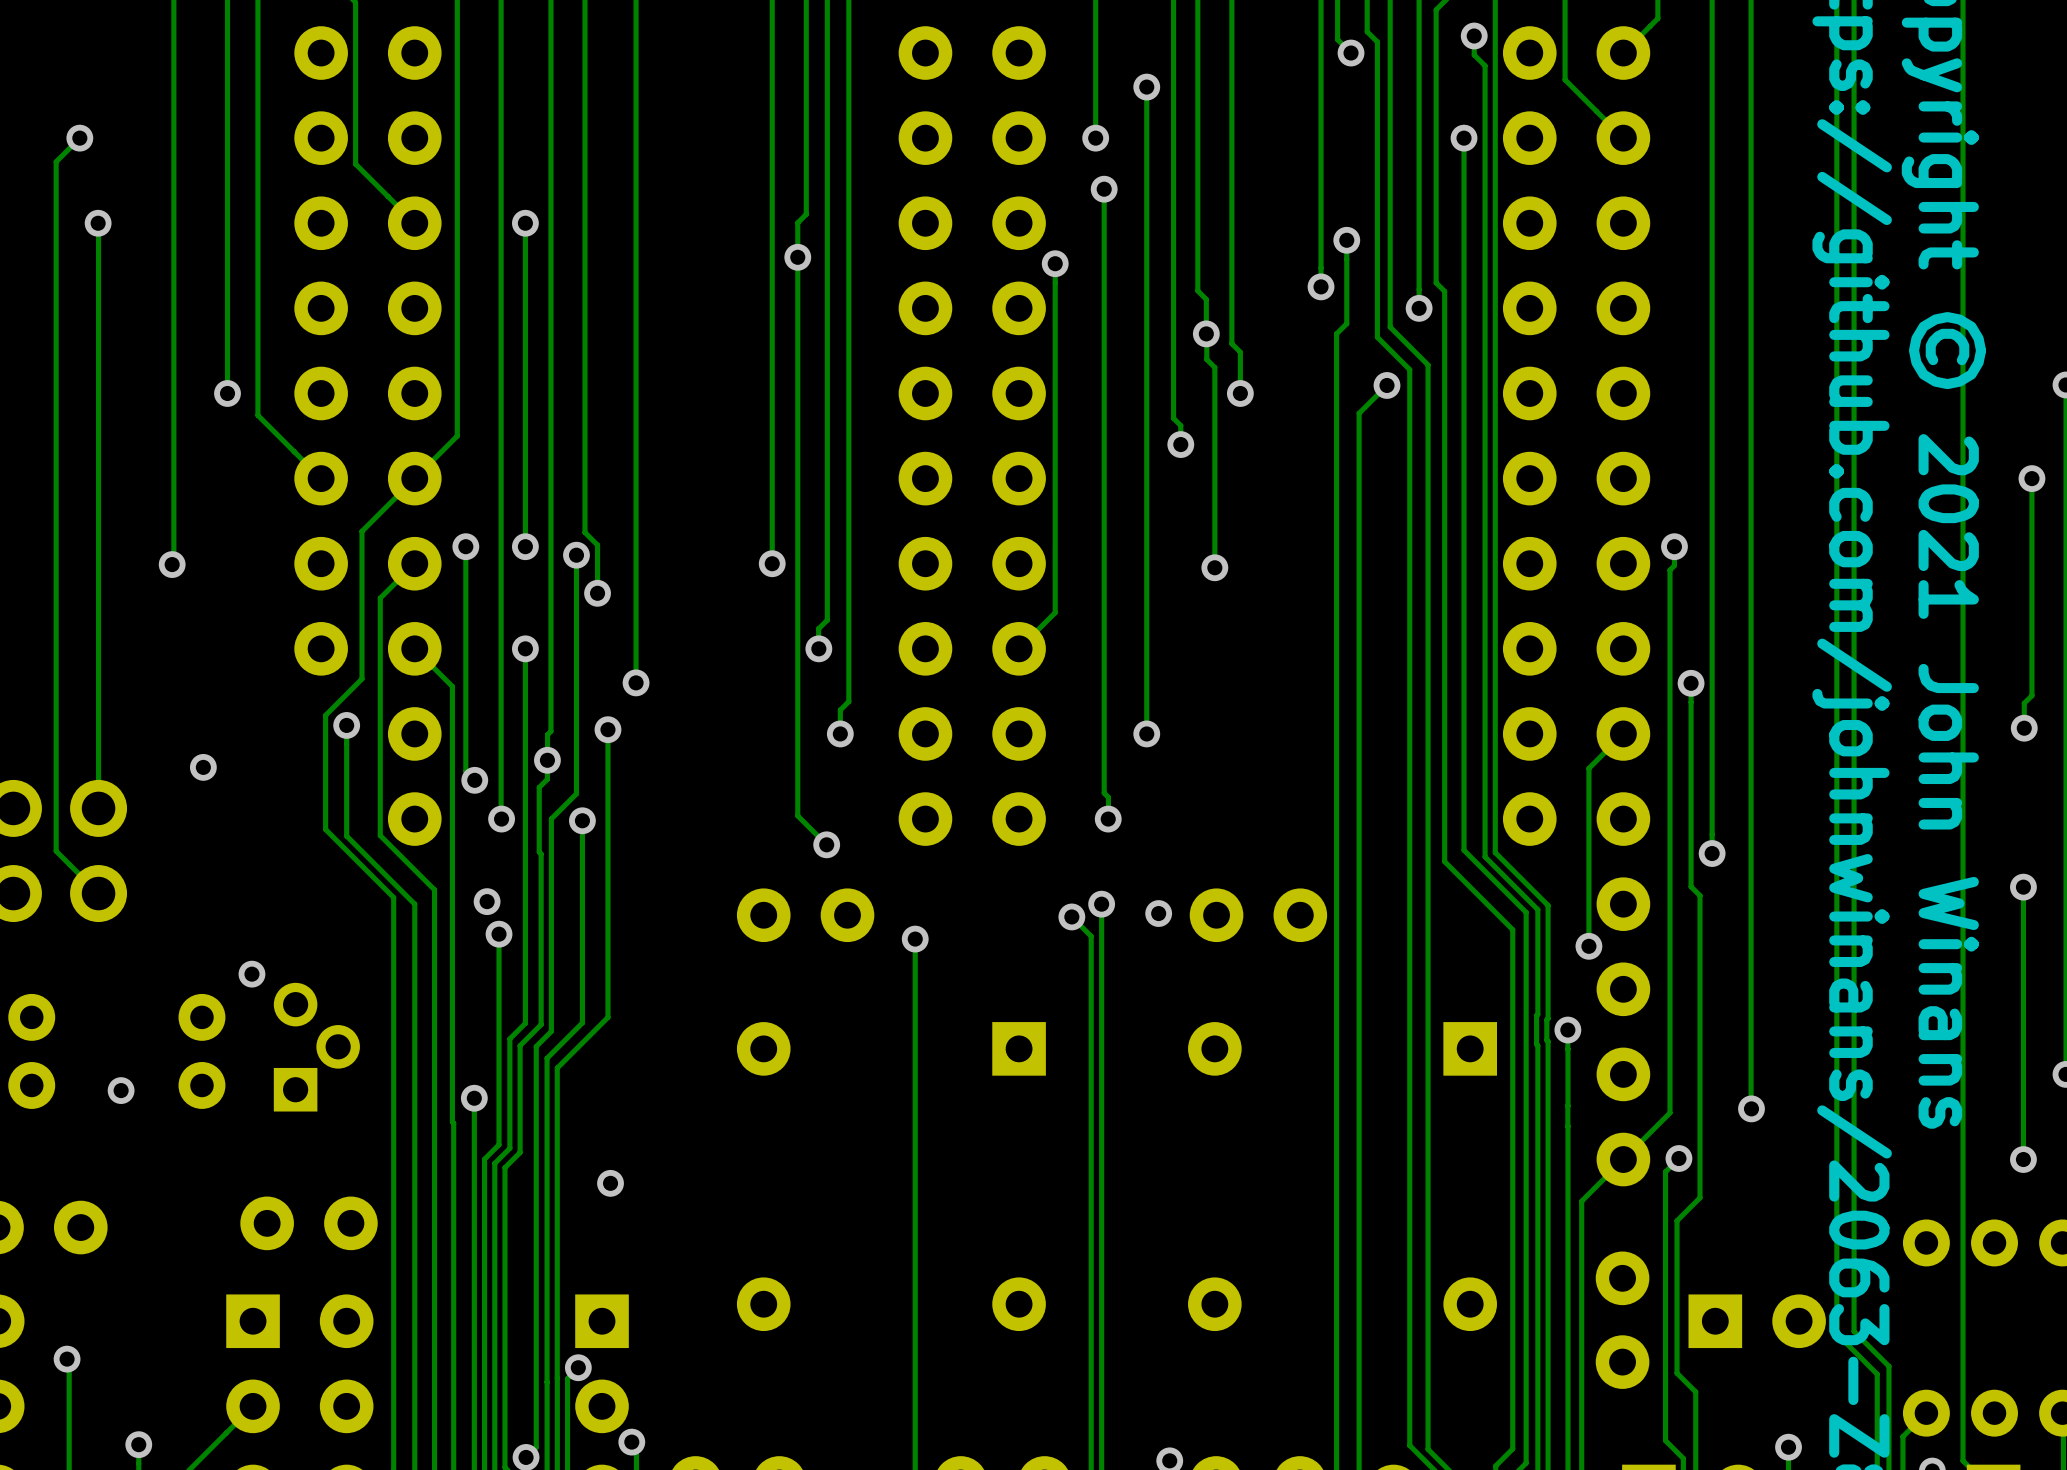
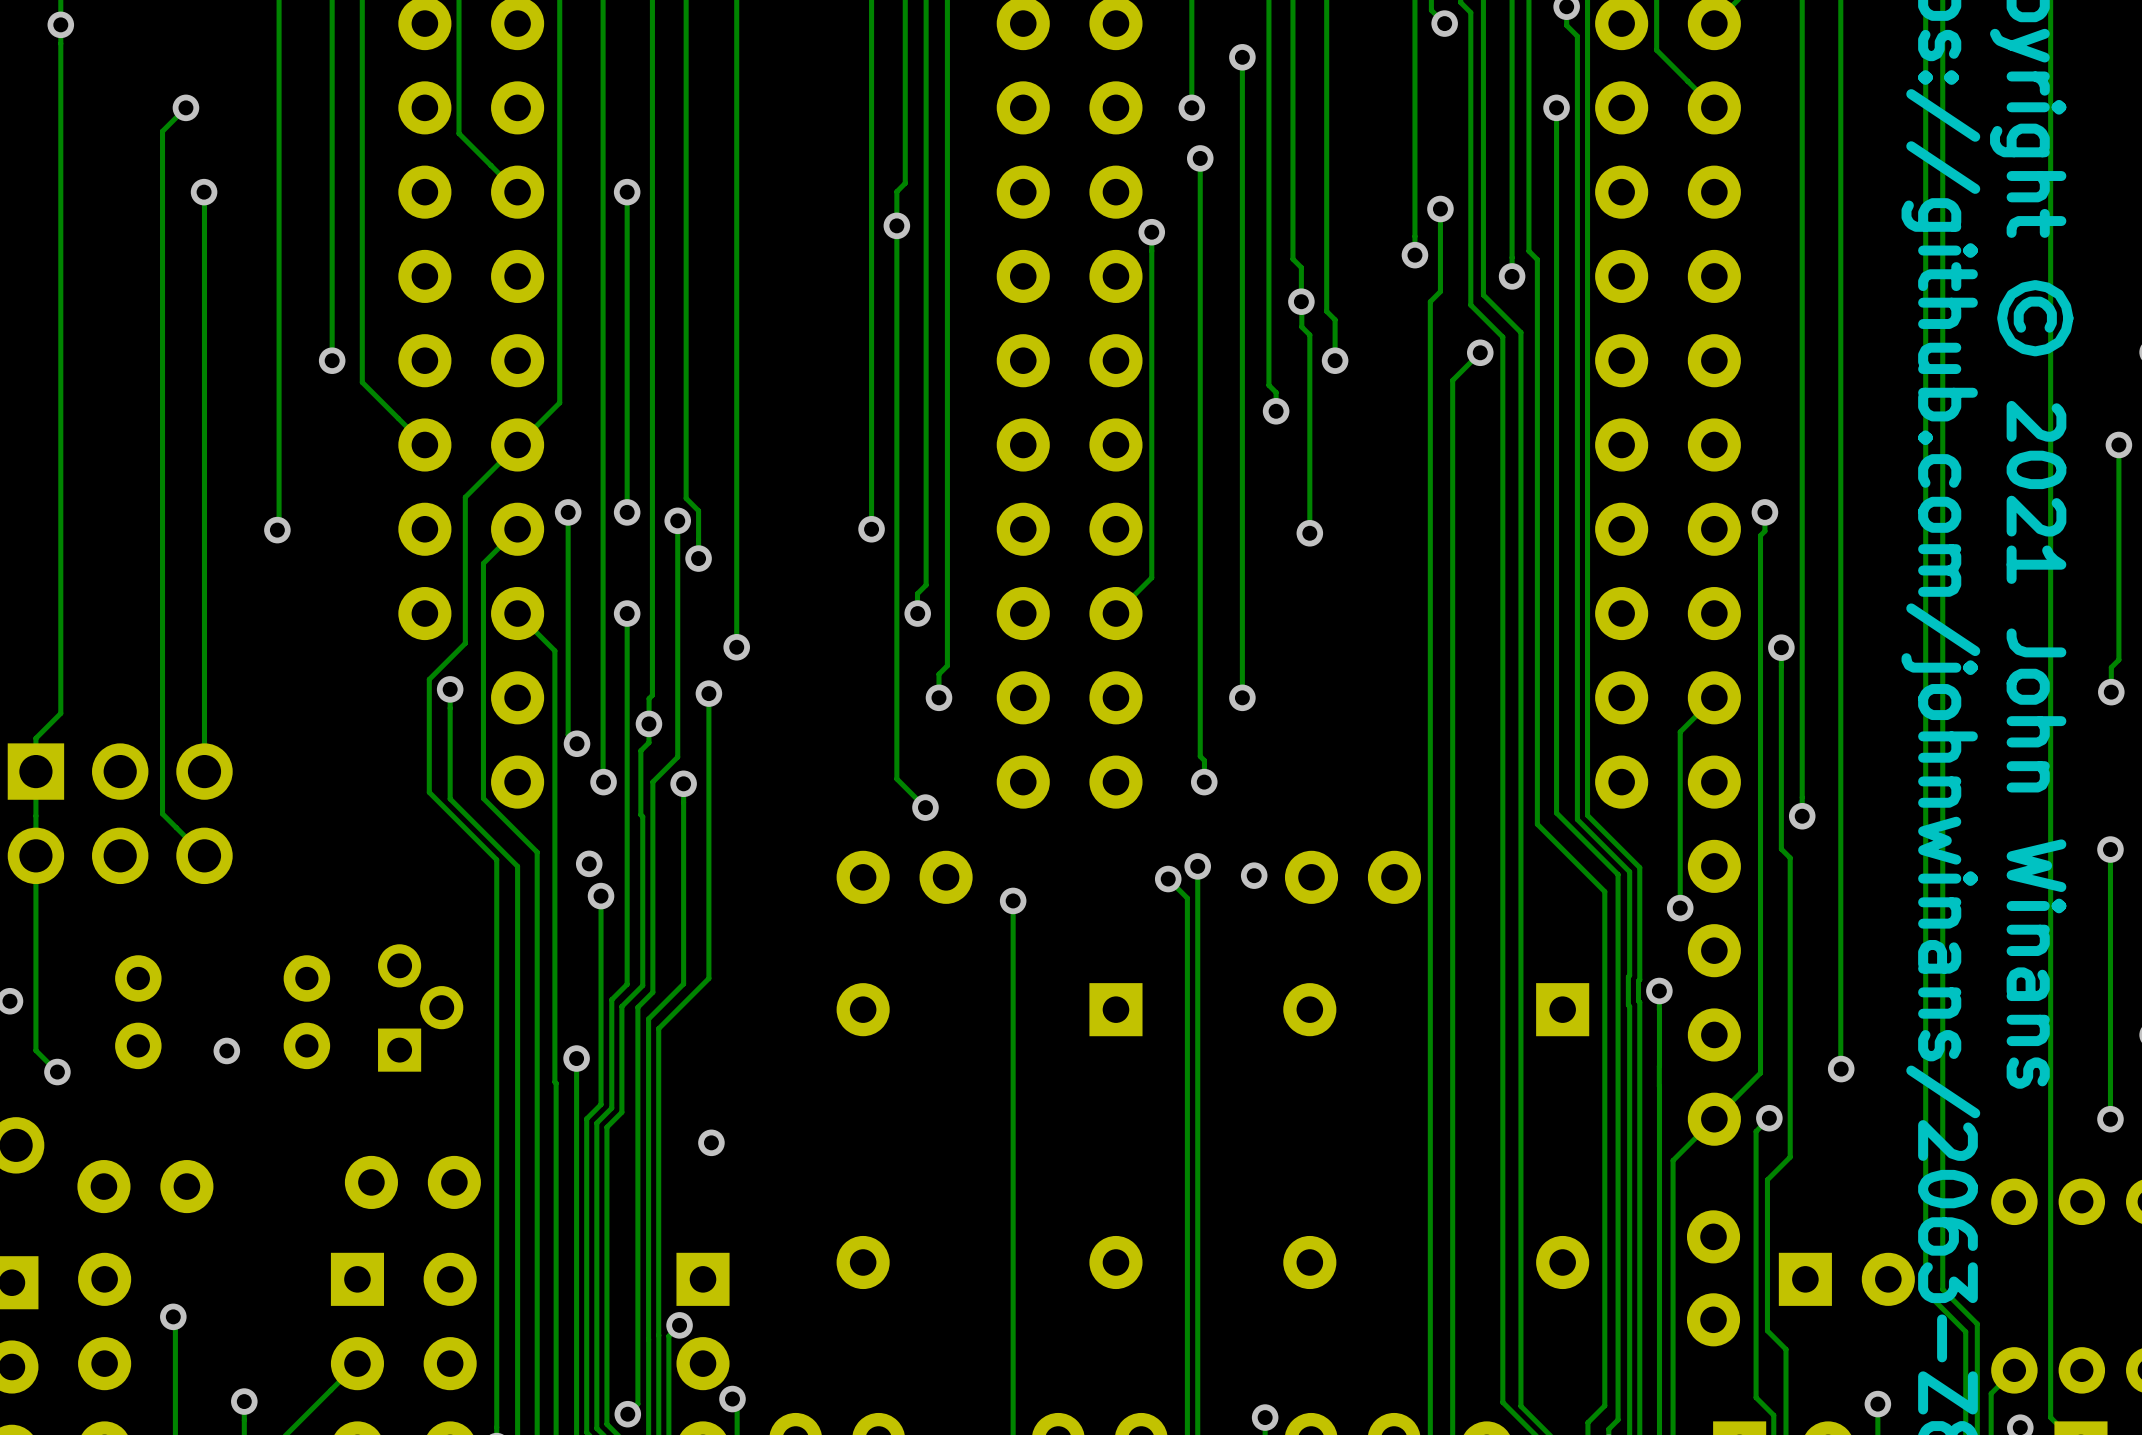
via: (203, 767) -> none
via: (251, 974) -> none

